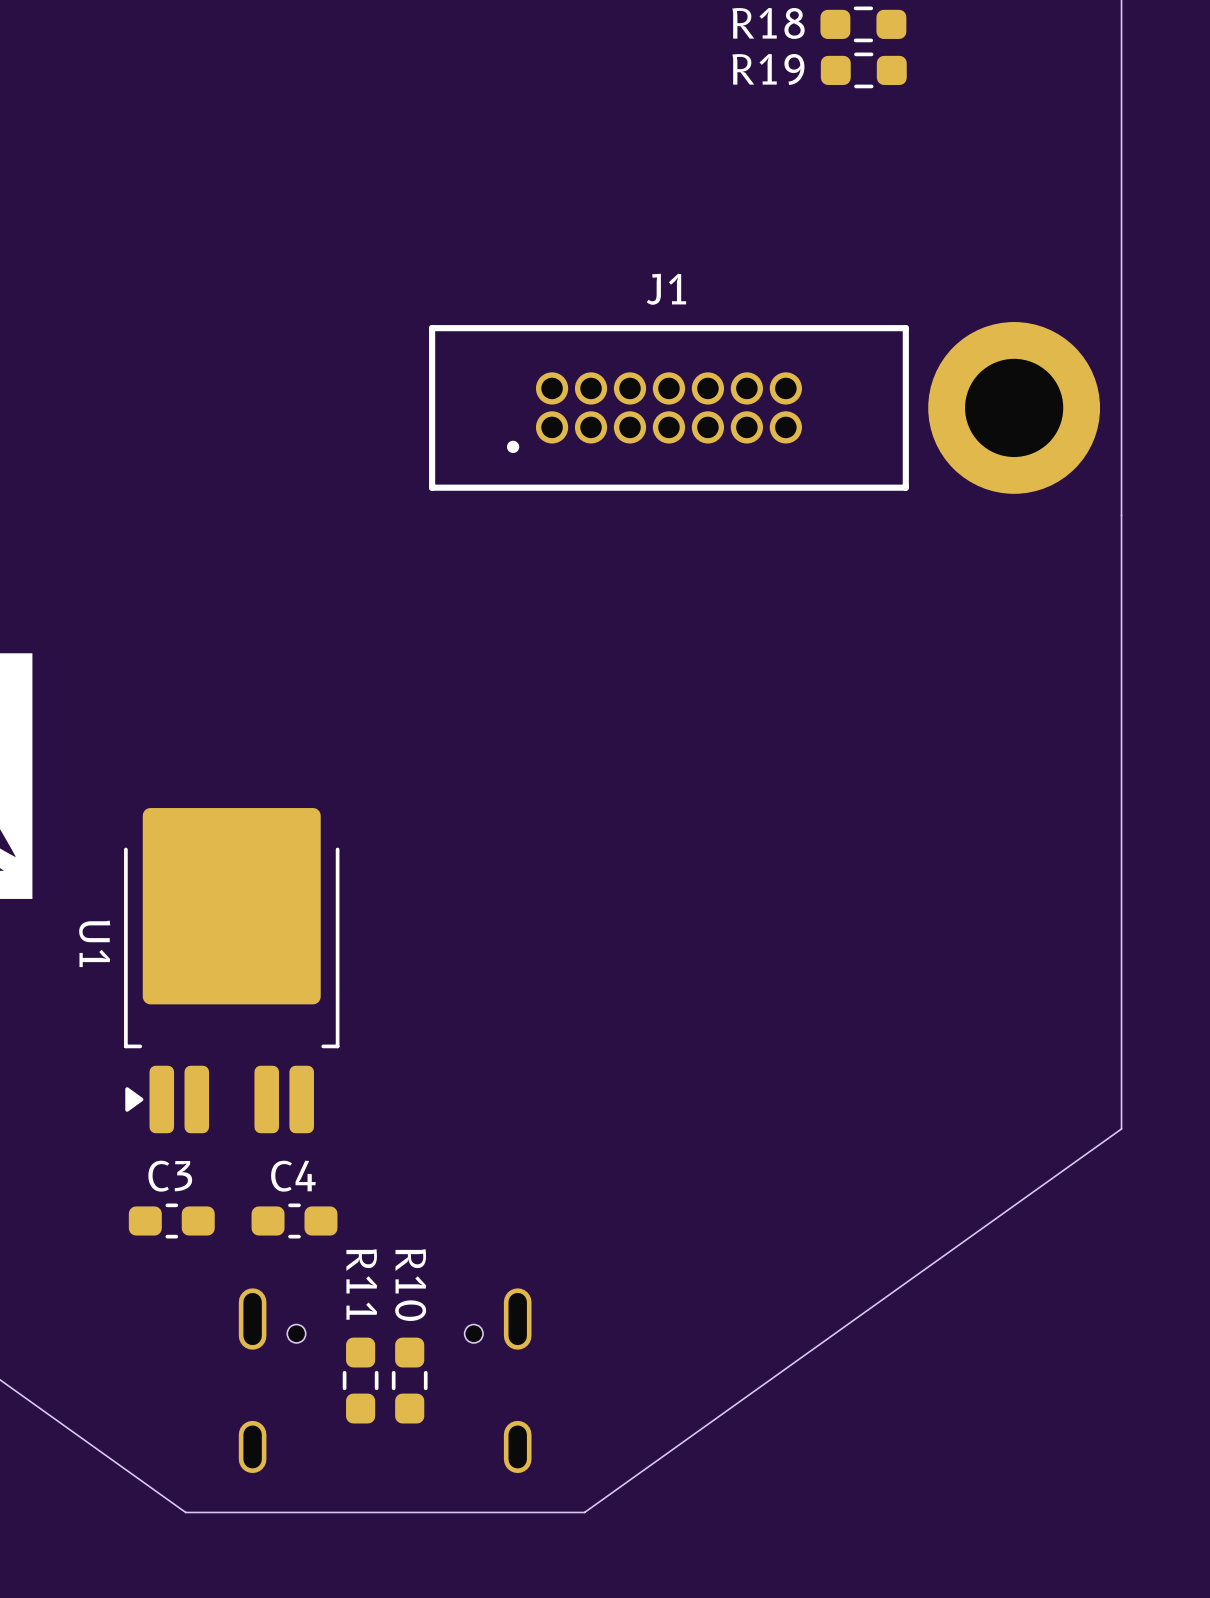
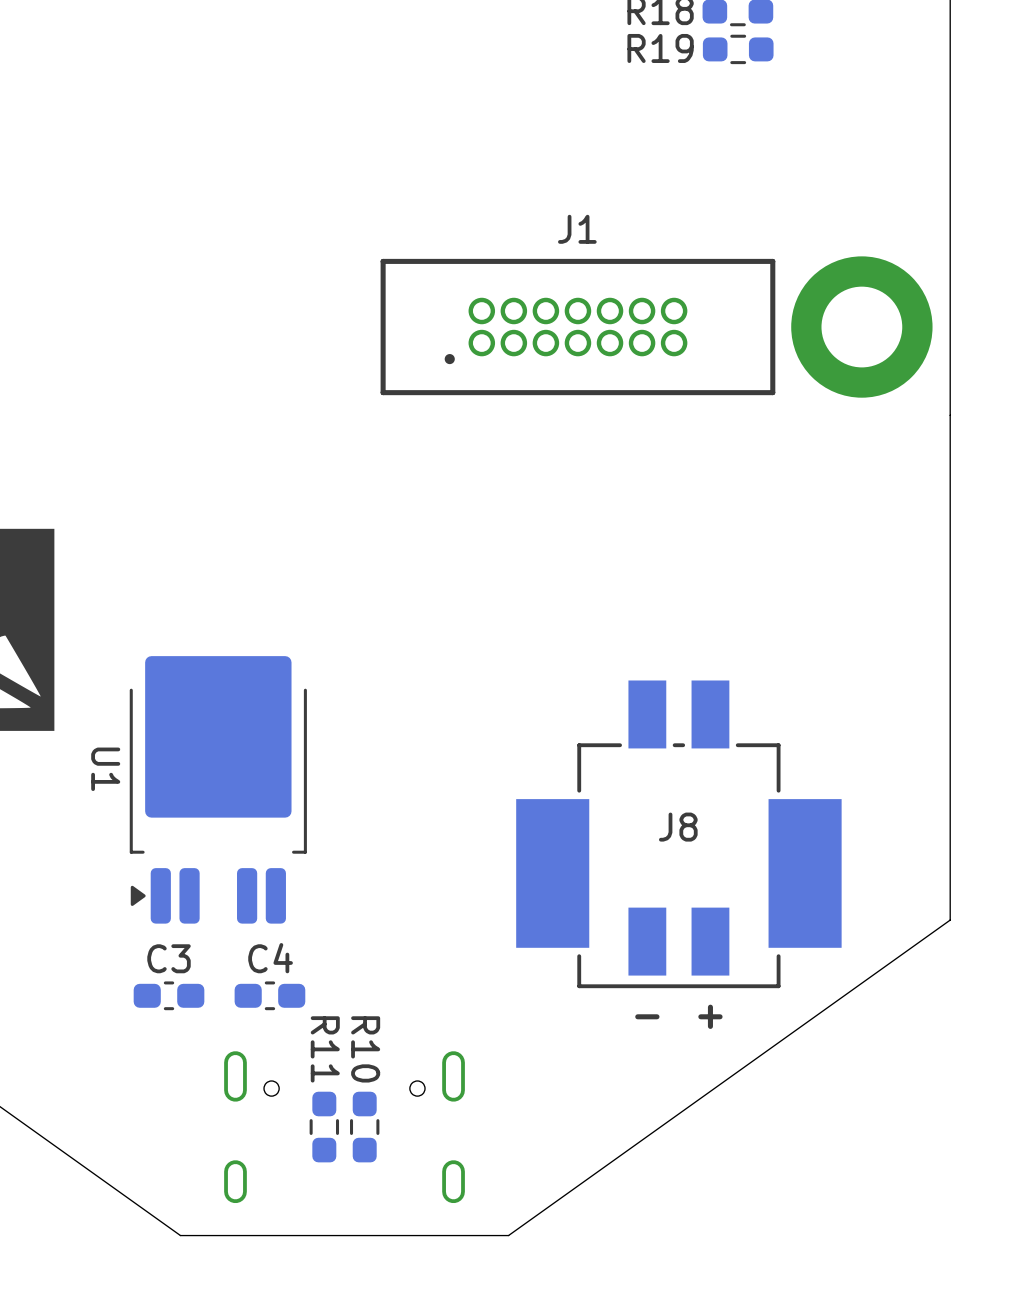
J8: none -> (678, 834)
text: none -> + (710, 1016)
text: none -> - (647, 1016)

